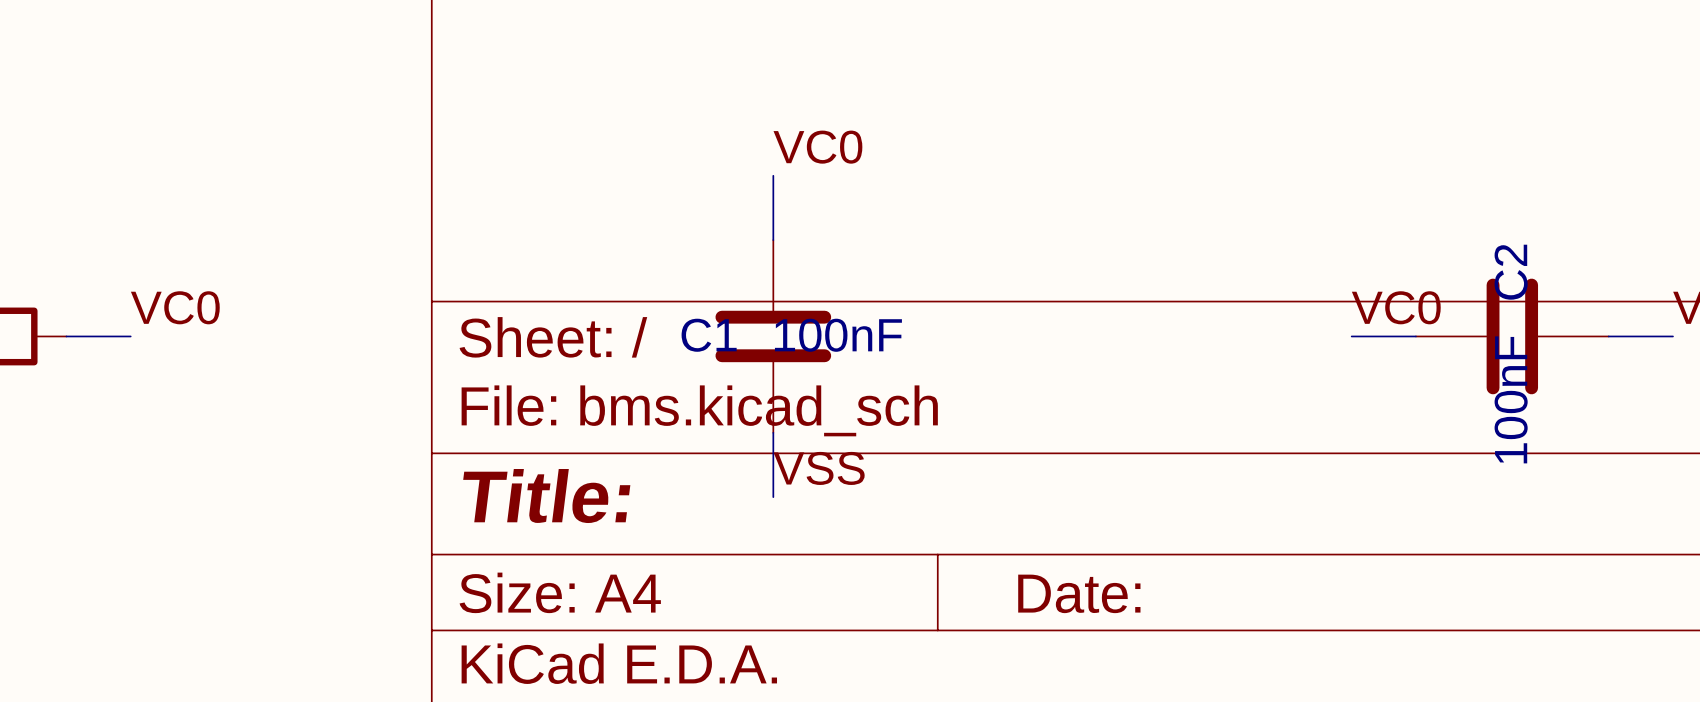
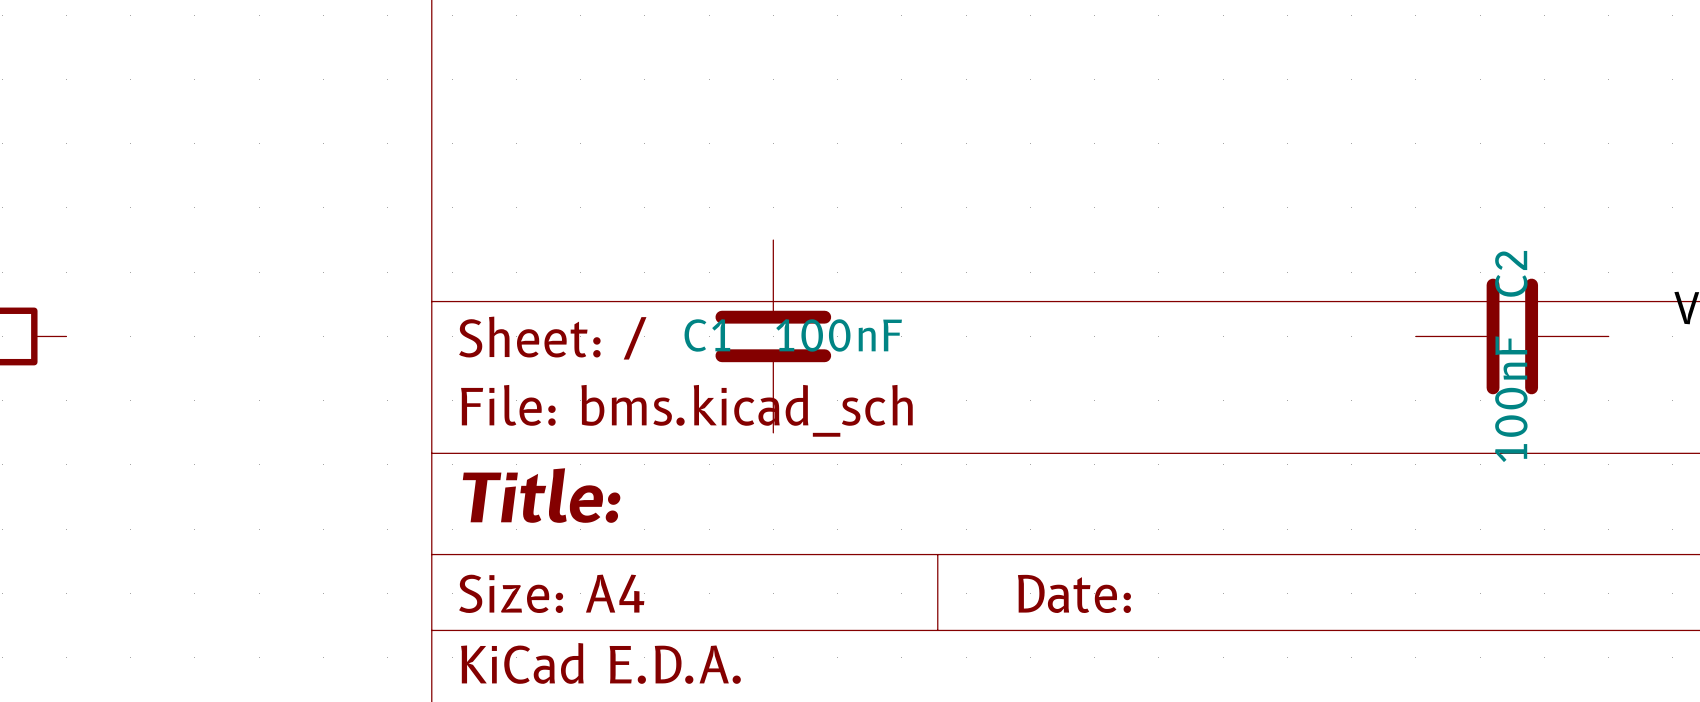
label: VC0 (817, 147) -> none
wire: (773, 175) (773, 240) -> none
label: VC0 (175, 307) -> none
label: VC0 (1396, 307) -> none
wire: (66, 336) (130, 336) -> none
wire: (1351, 336) (1415, 336) -> none
wire: (1608, 336) (1672, 336) -> none
wire: (773, 432) (773, 497) -> none
label: VSS (819, 468) -> none

